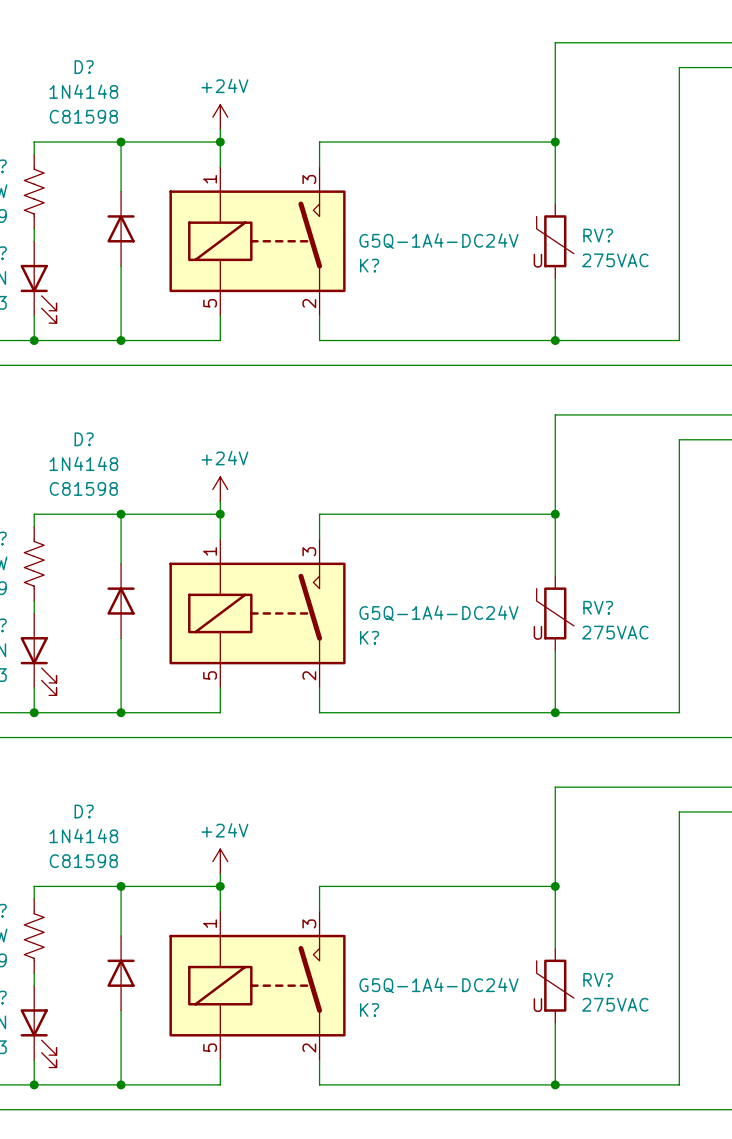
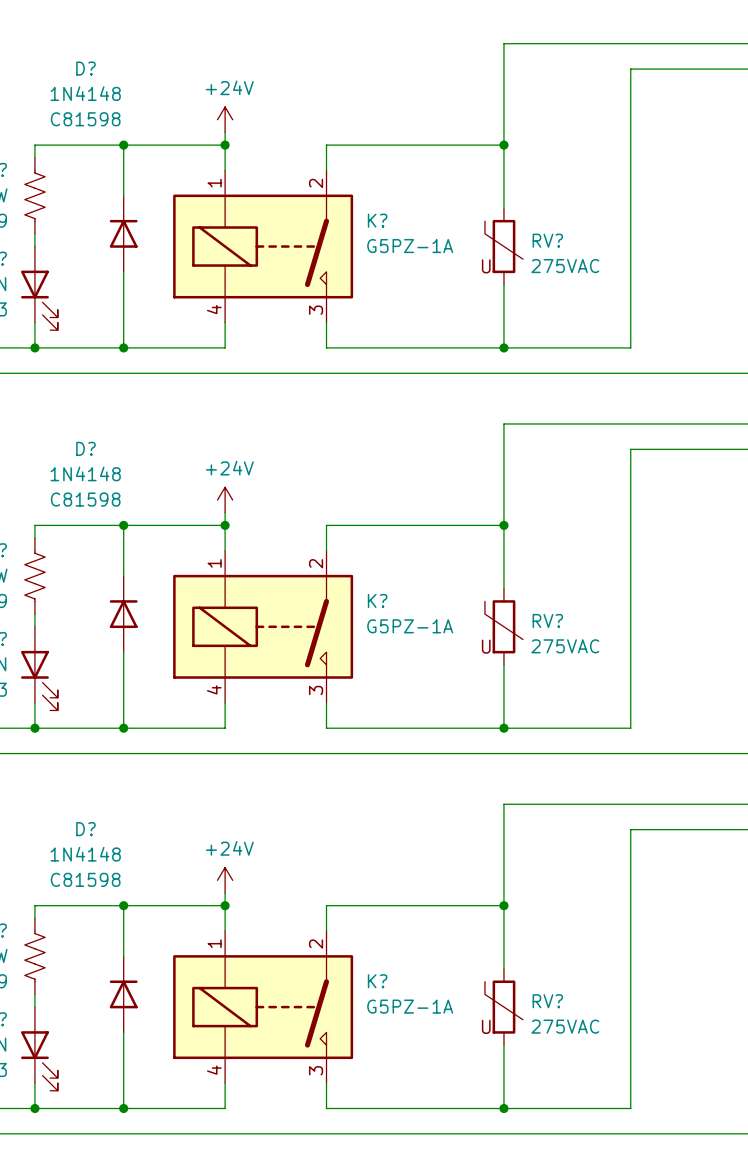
wire: (555, 42) (555, 204) -> (567, 43) (503, 43) (503, 208)
wire: (679, 67) (679, 340) (617, 340) -> (694, 69) (630, 69) (630, 347)
wire: (493, 142) (555, 142) -> none
junction: none -> (503, 145)
junction: (555, 142) -> none
K? symbol: [169, 166, 346, 316] -> [173, 170, 354, 323]
K? value: G5Q-1A4-DC24V (438, 241) -> G5PZ-1A (410, 246)
RV? position: (555, 241) -> (503, 246)
K? name position: K? (369, 265) -> K? (377, 220)
wire: (555, 278) (555, 340) -> (503, 284) (503, 347)
junction: none -> (503, 347)
junction: (555, 340) -> none
wire: (555, 414) (555, 576) -> (567, 423) (503, 423) (503, 588)
wire: (679, 439) (679, 712) (617, 712) -> (694, 449) (630, 449) (630, 728)
wire: (493, 514) (555, 514) -> none
junction: none -> (503, 525)
junction: (555, 514) -> none
K? symbol: [169, 539, 346, 688] -> [173, 550, 354, 703]
K? value: G5Q-1A4-DC24V (438, 613) -> G5PZ-1A (410, 626)
RV? position: (555, 613) -> (503, 626)
K? name position: K? (369, 637) -> K? (377, 600)
wire: (555, 650) (555, 712) -> (503, 664) (503, 728)
junction: none -> (503, 728)
junction: (555, 712) -> none
wire: (555, 787) (555, 948) -> (567, 804) (503, 804) (503, 969)
wire: (679, 811) (679, 1084) (617, 1084) -> (694, 829) (630, 829) (630, 1108)
wire: (493, 886) (555, 886) -> none
junction: none -> (503, 905)
junction: (555, 886) -> none
K? symbol: [169, 911, 346, 1061] -> [173, 931, 354, 1084]
K? value: G5Q-1A4-DC24V (438, 985) -> G5PZ-1A (410, 1006)
RV? position: (555, 985) -> (503, 1007)
K? name position: K? (369, 1010) -> K? (377, 981)
wire: (555, 1022) (555, 1084) -> (503, 1045) (503, 1108)
junction: none -> (503, 1108)
junction: (555, 1084) -> none

